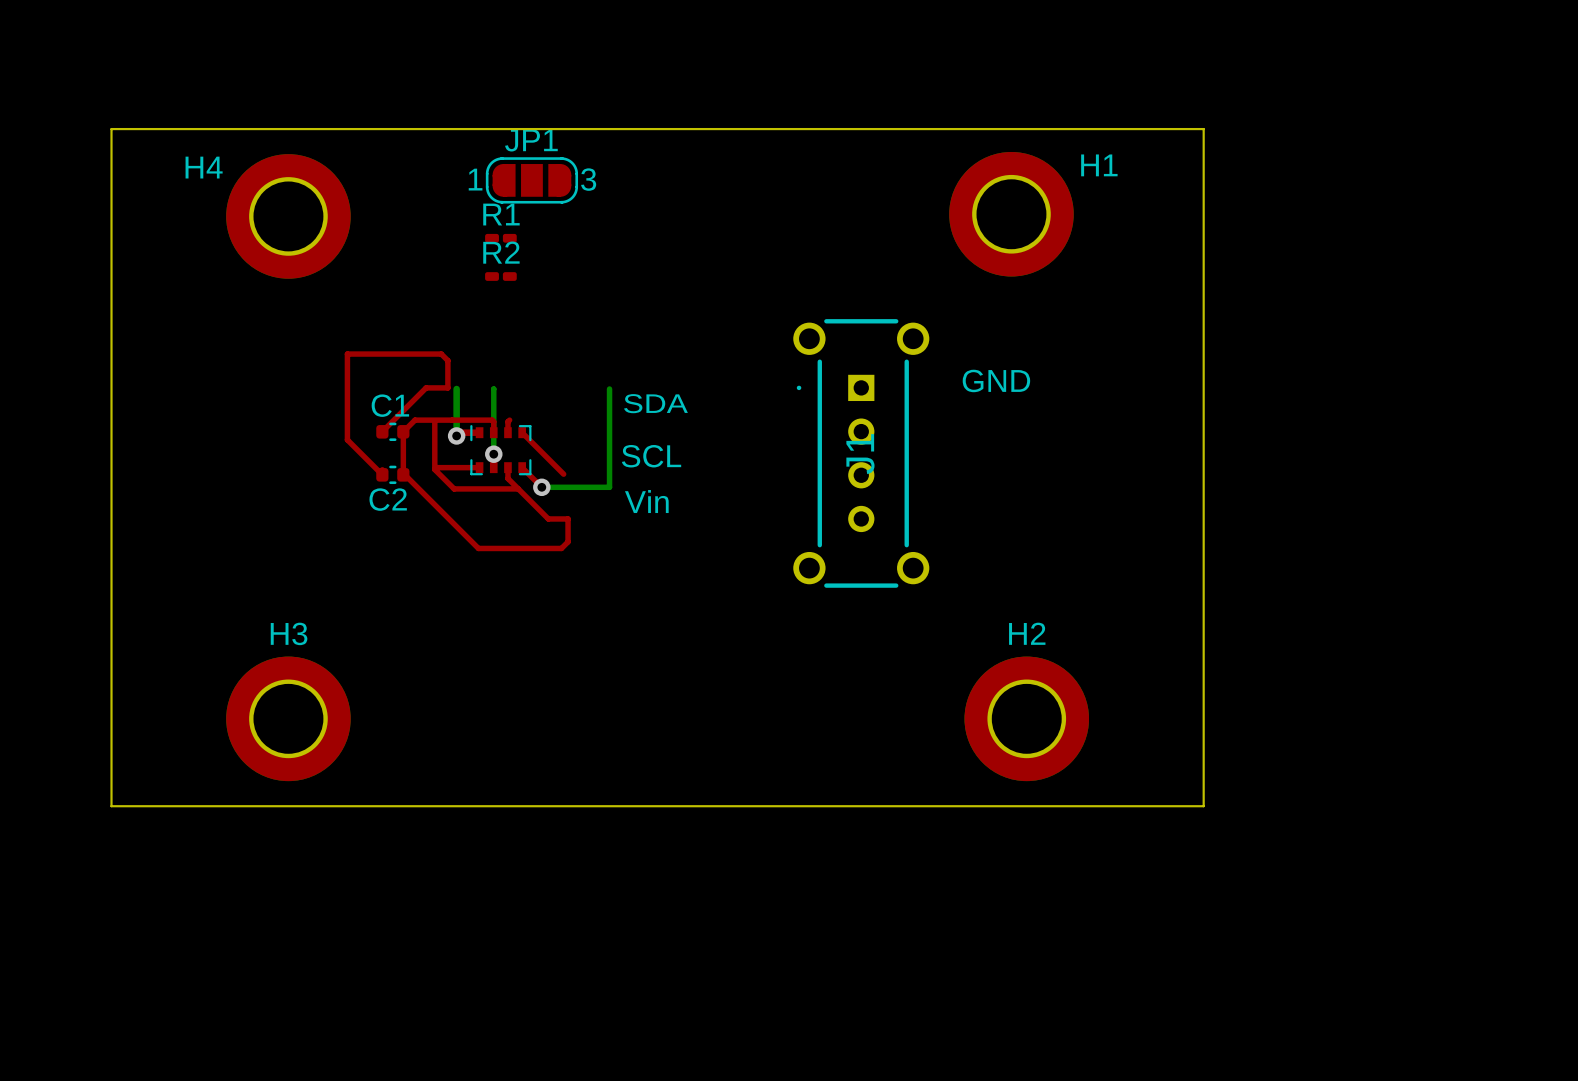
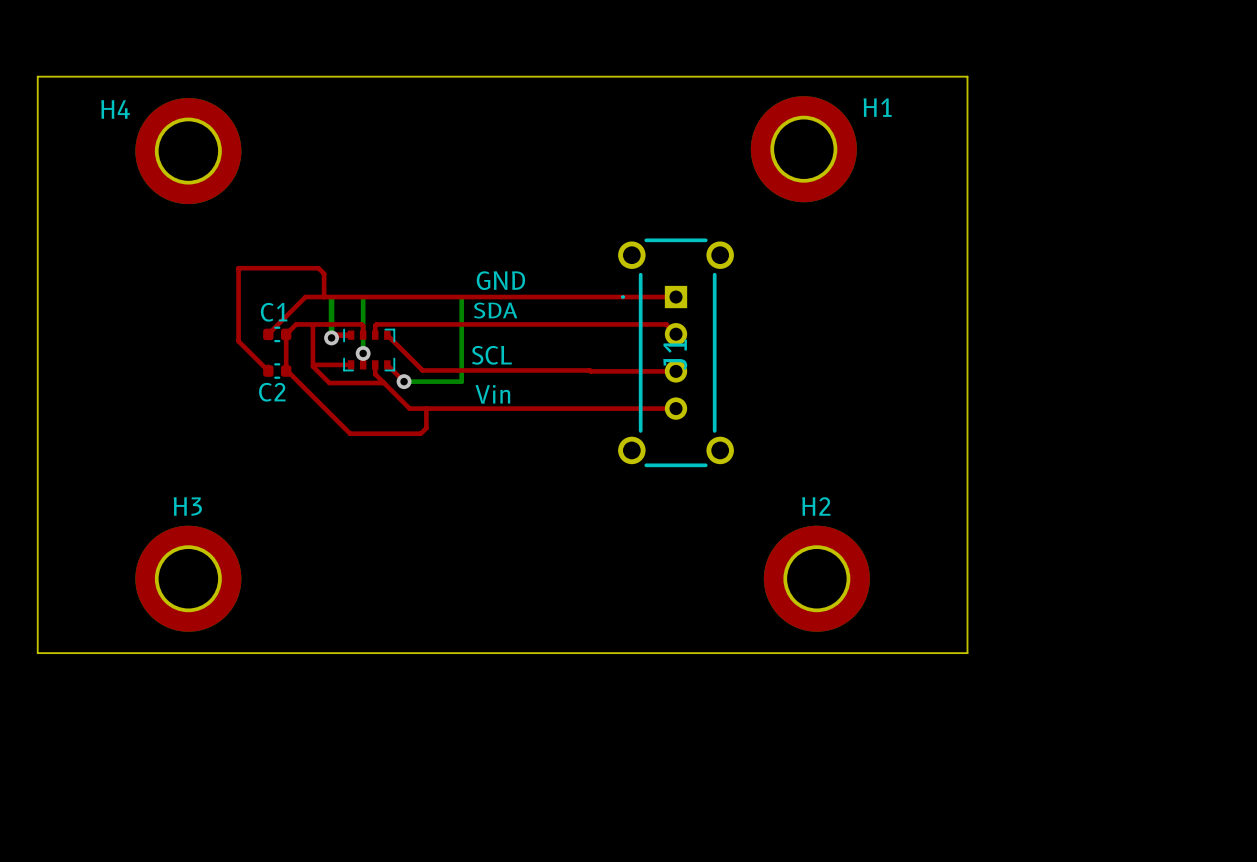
JP1: (531, 180) -> none
R1: (500, 238) -> none
R2: (500, 276) -> none
text position: GND (996, 380) -> GND (500, 280)
top track: none -> (324, 297) (676, 297)
top track: none -> (376, 324) (666, 324) (676, 334)
top track: none -> (422, 370) (676, 371)
top track: none -> (426, 408) (676, 408)

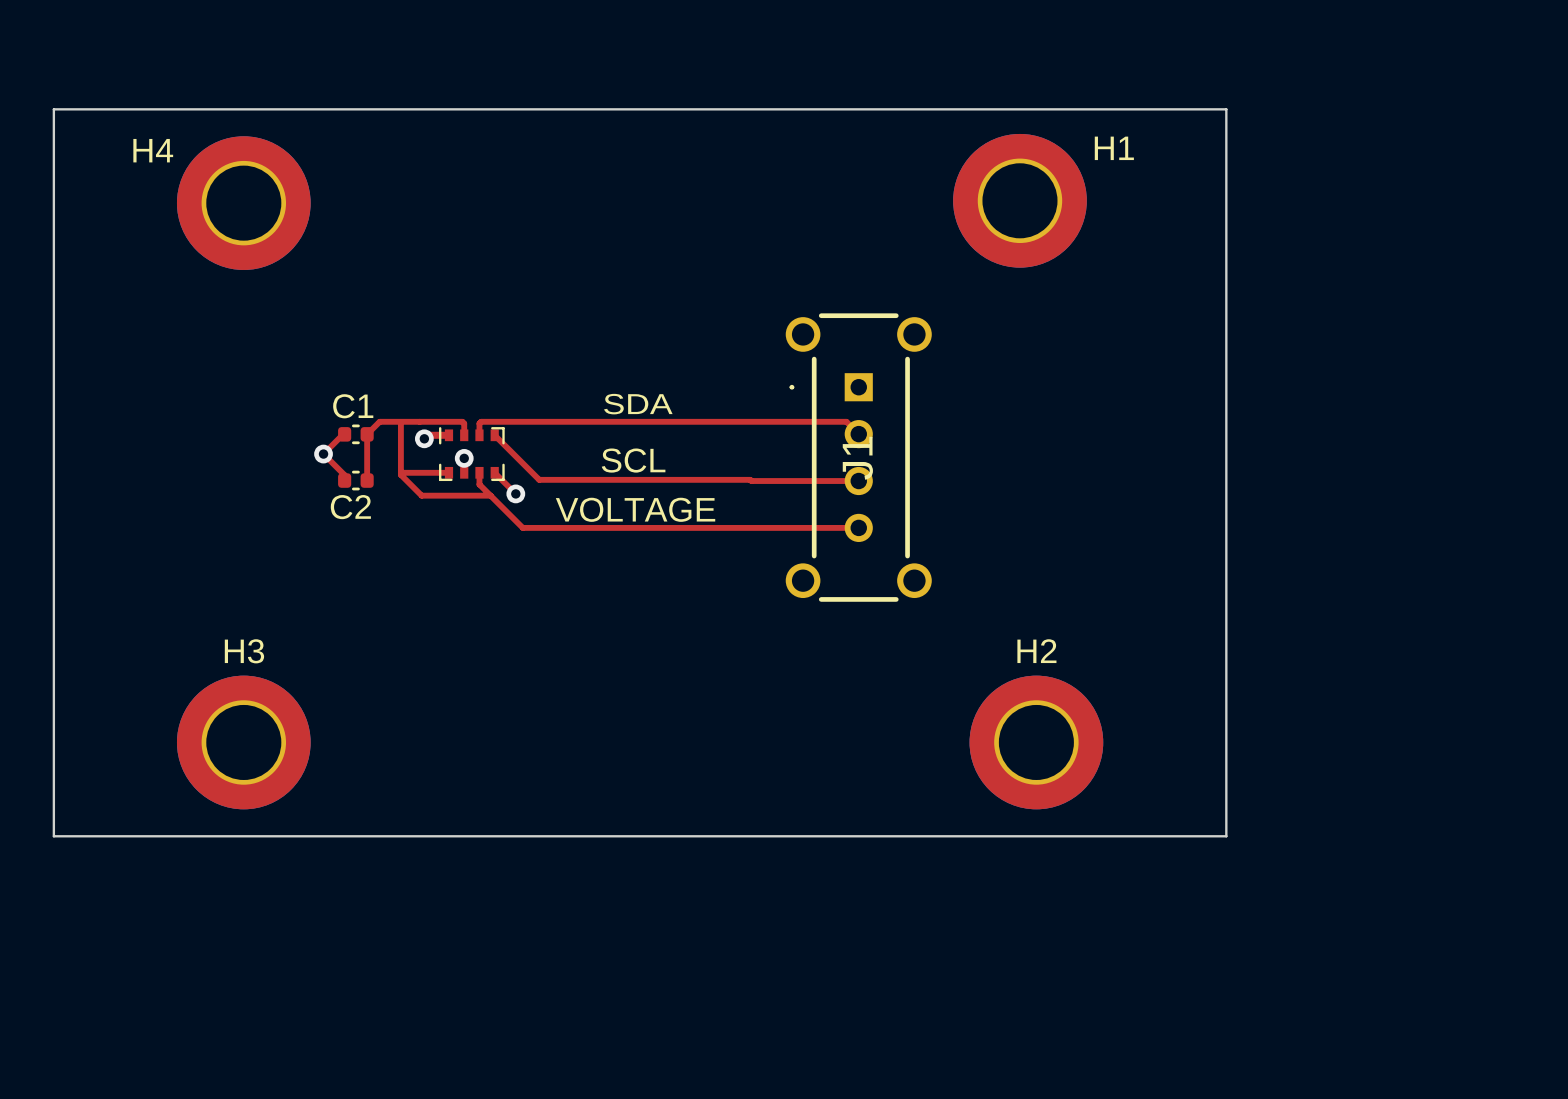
text: GND (500, 280) -> none
top track: (324, 297) (324, 273) (318, 268) (238, 268) (238, 341) (268, 371) -> none
bottom track: (331, 297) (331, 337) -> none
bottom track: (363, 297) (363, 353) -> none
bottom track: (461, 297) (461, 381) (404, 381) -> none
top track: (676, 297) (305, 297) (268, 334) -> none
top track: none -> (343, 434) (323, 454) (344, 475)
via: none -> (323, 454)
top track: (286, 371) (350, 433) (420, 433) (426, 428) (426, 408) -> none
text: none -> VOLTAGE (635, 509)
text: Vin (492, 394) -> none

